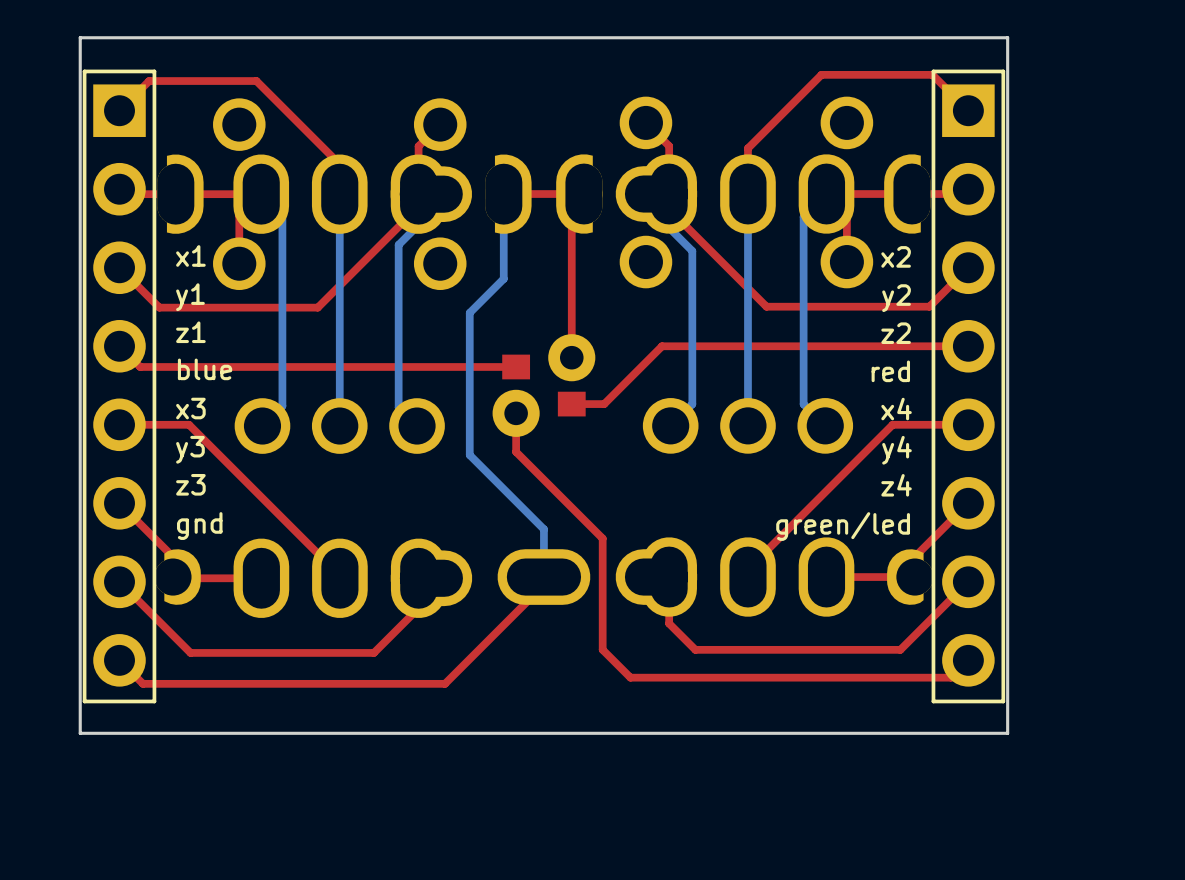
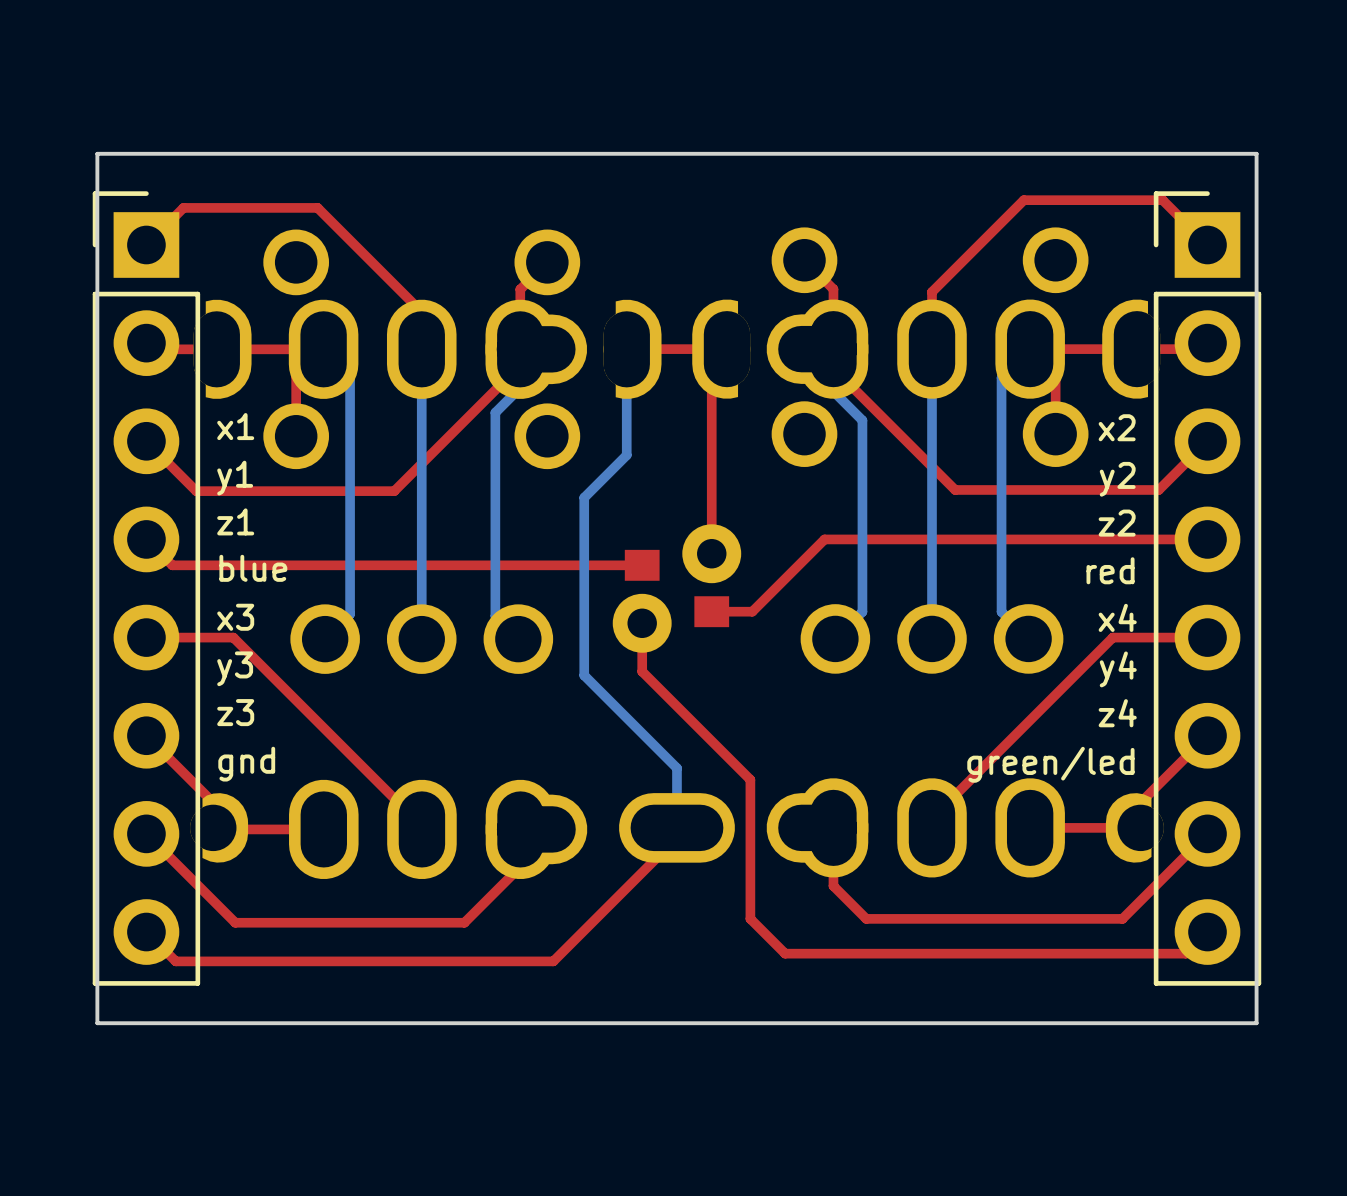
part footprint: [82, 69, 157, 704] -> [92, 191, 201, 986]
part footprint: [931, 69, 1006, 704] -> [1153, 191, 1262, 986]

